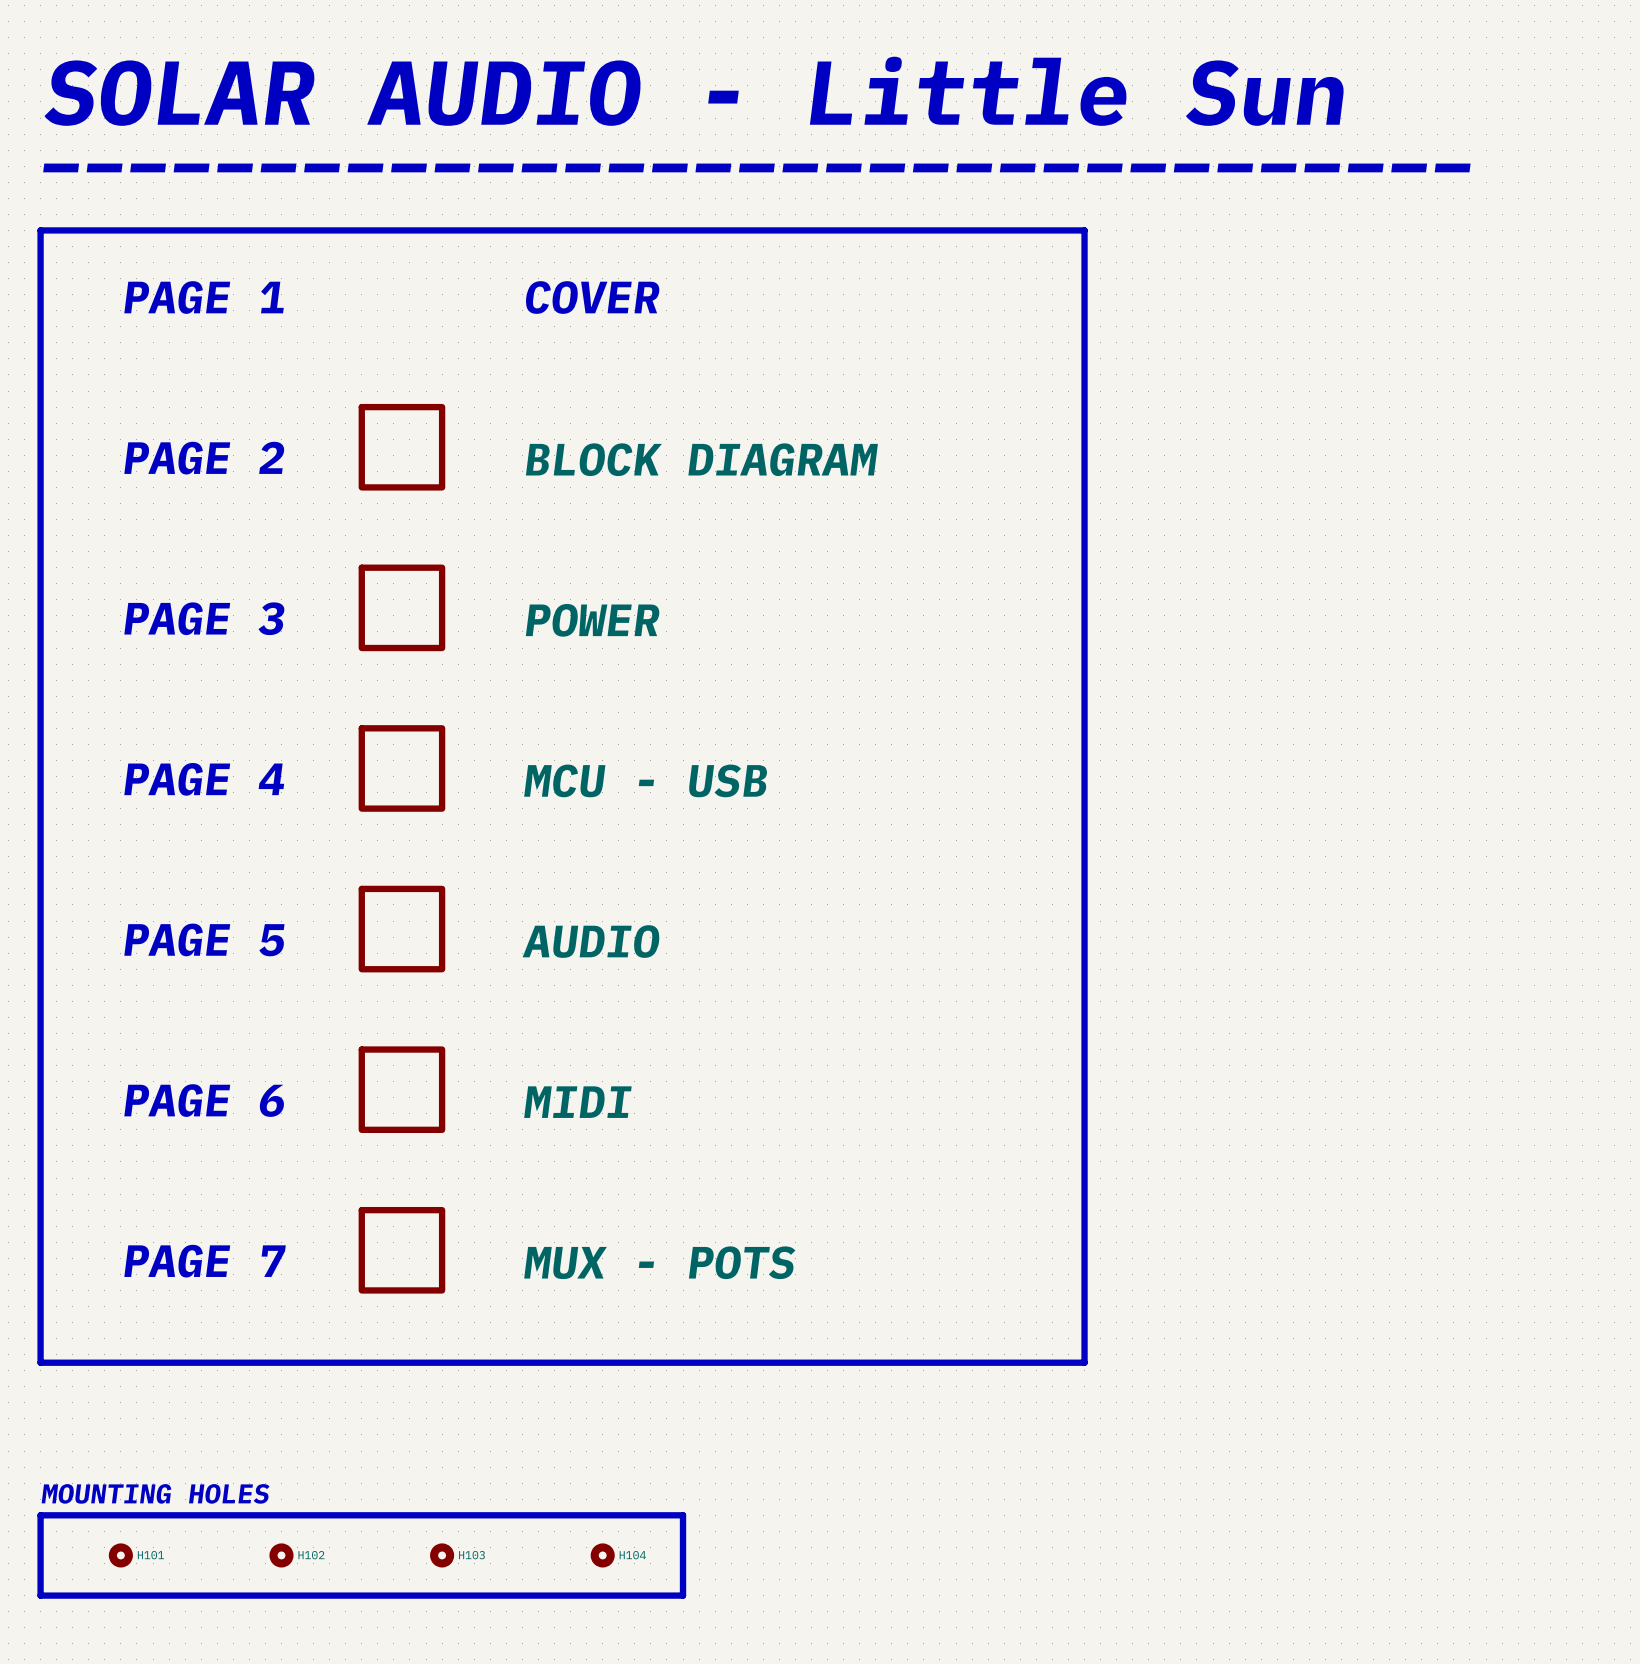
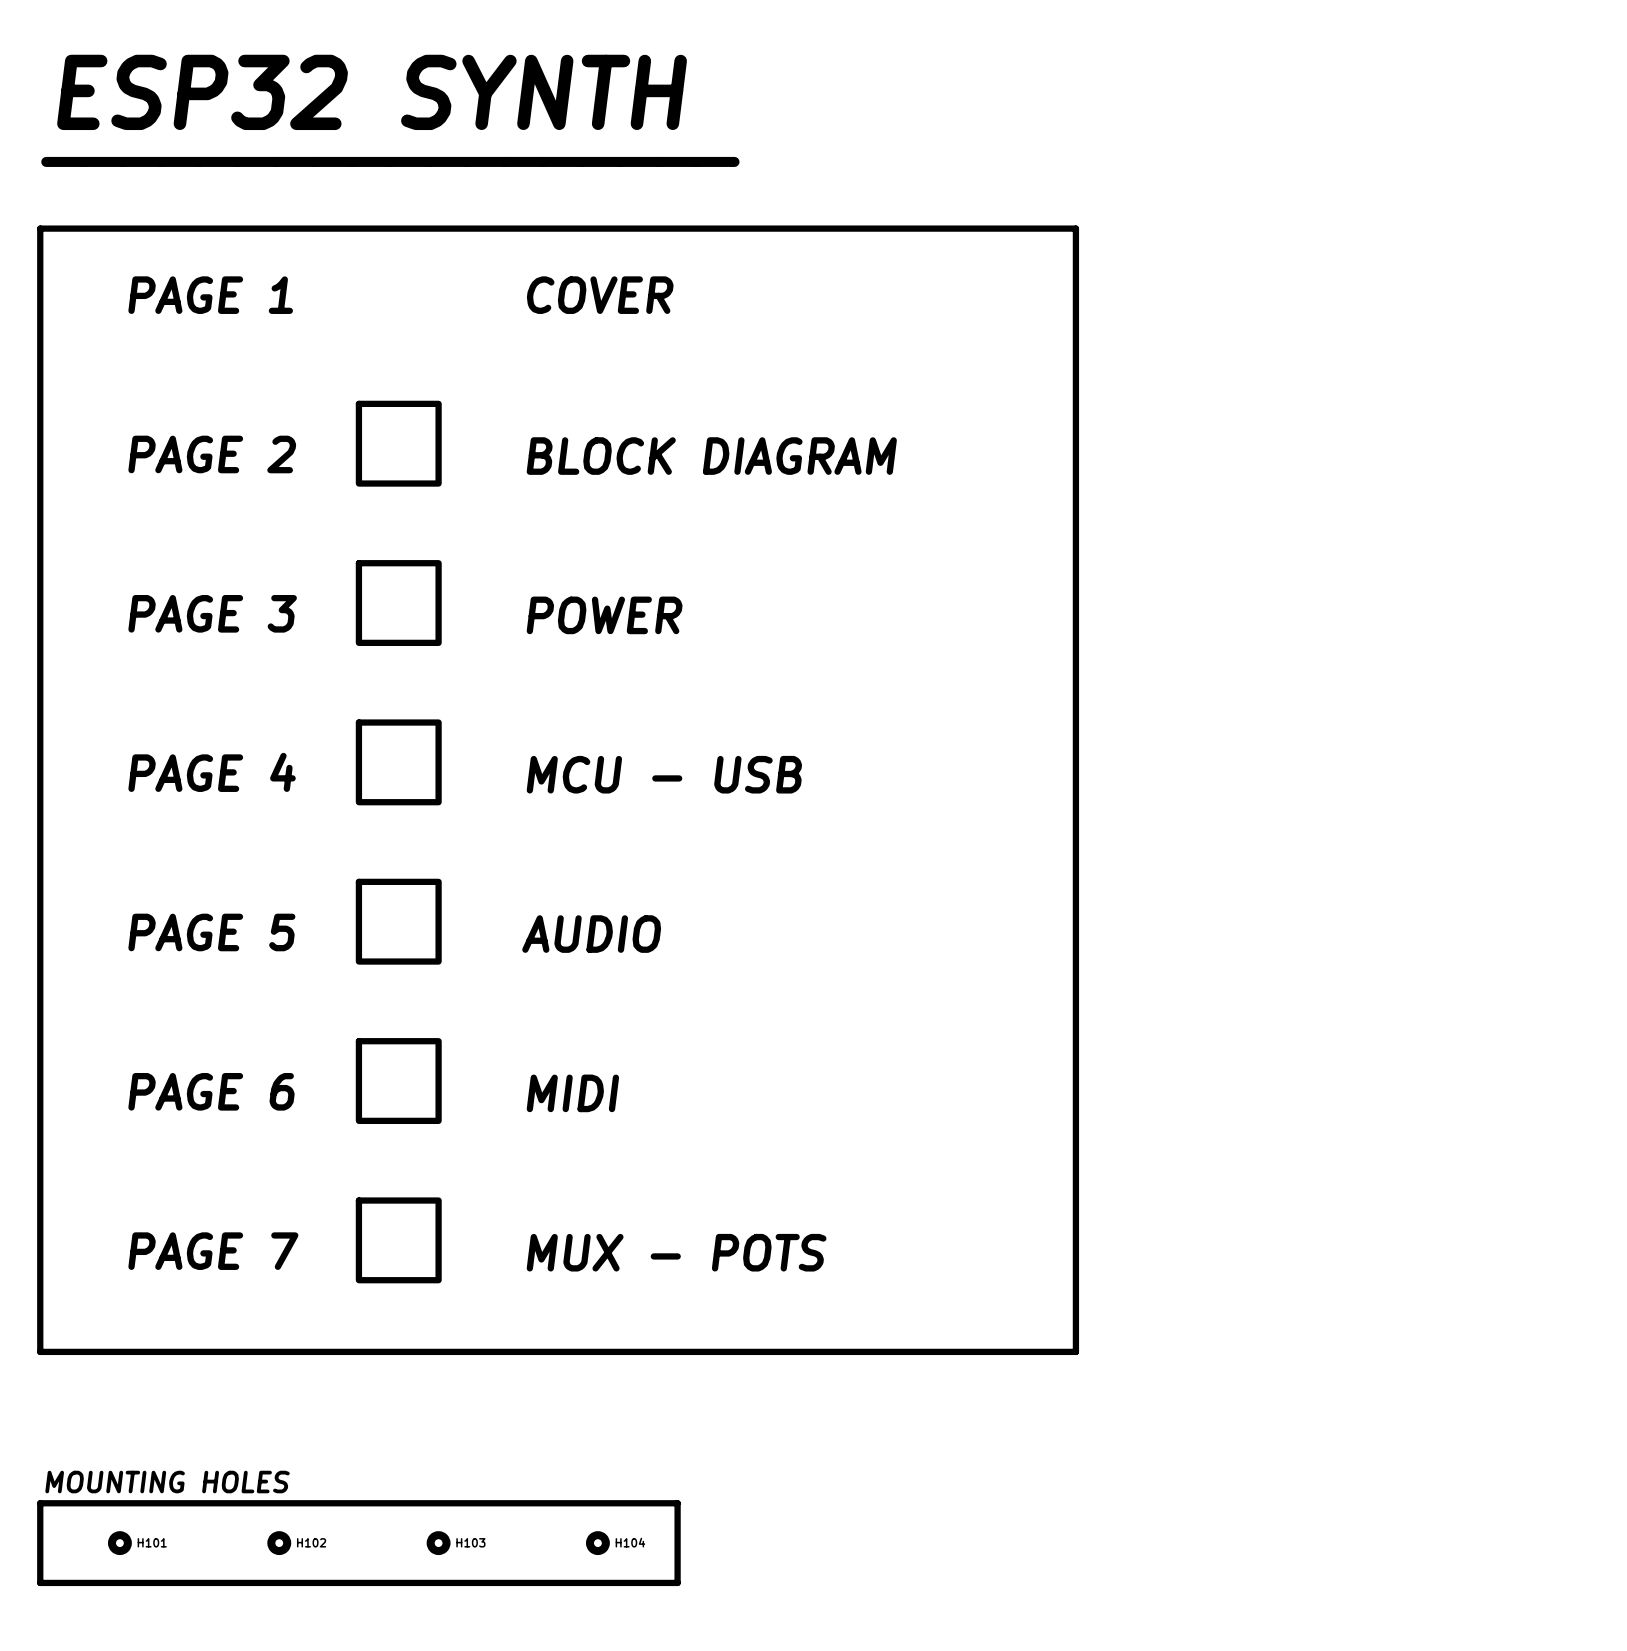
text: SOLAR AUDIO - Little Sun (694, 91) -> ESP32 SYNTH (372, 92)
text: _________________________________ (756, 167) -> __________________ (390, 161)

